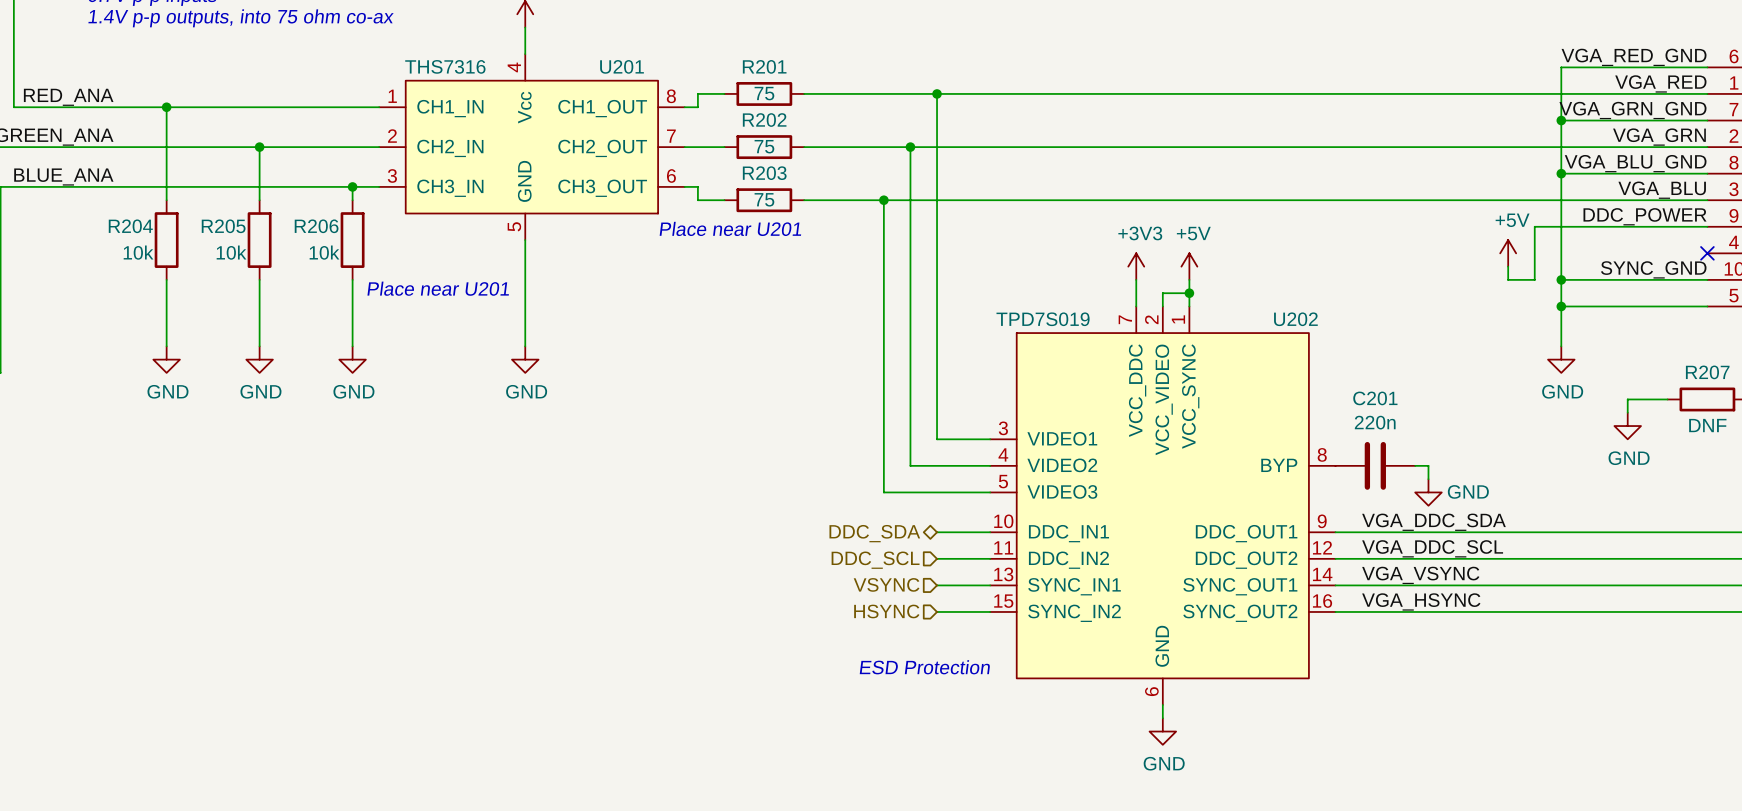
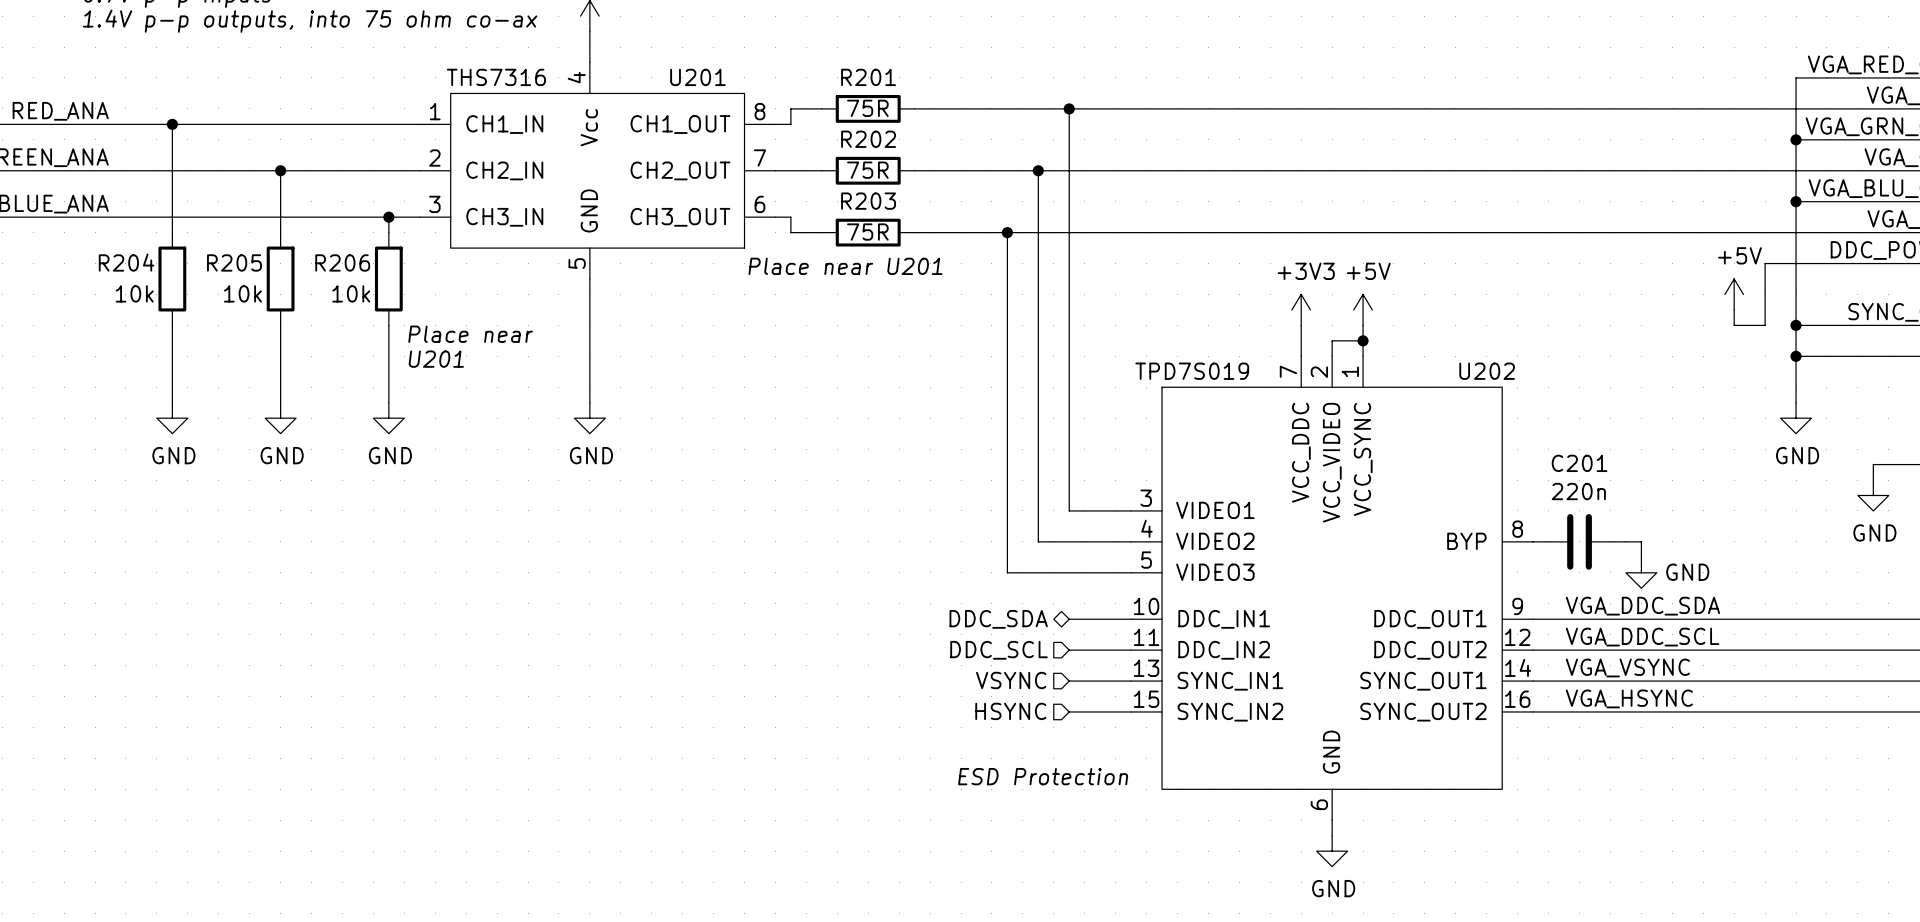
R201 value: 75 (764, 93) -> 75R (867, 108)
R202 value: 75 (764, 146) -> 75R (867, 170)
R203 value: 75 (764, 199) -> 75R (867, 232)
text: Place near U201 (438, 288) -> Place near (470, 334)
text: none -> U201 (436, 359)

